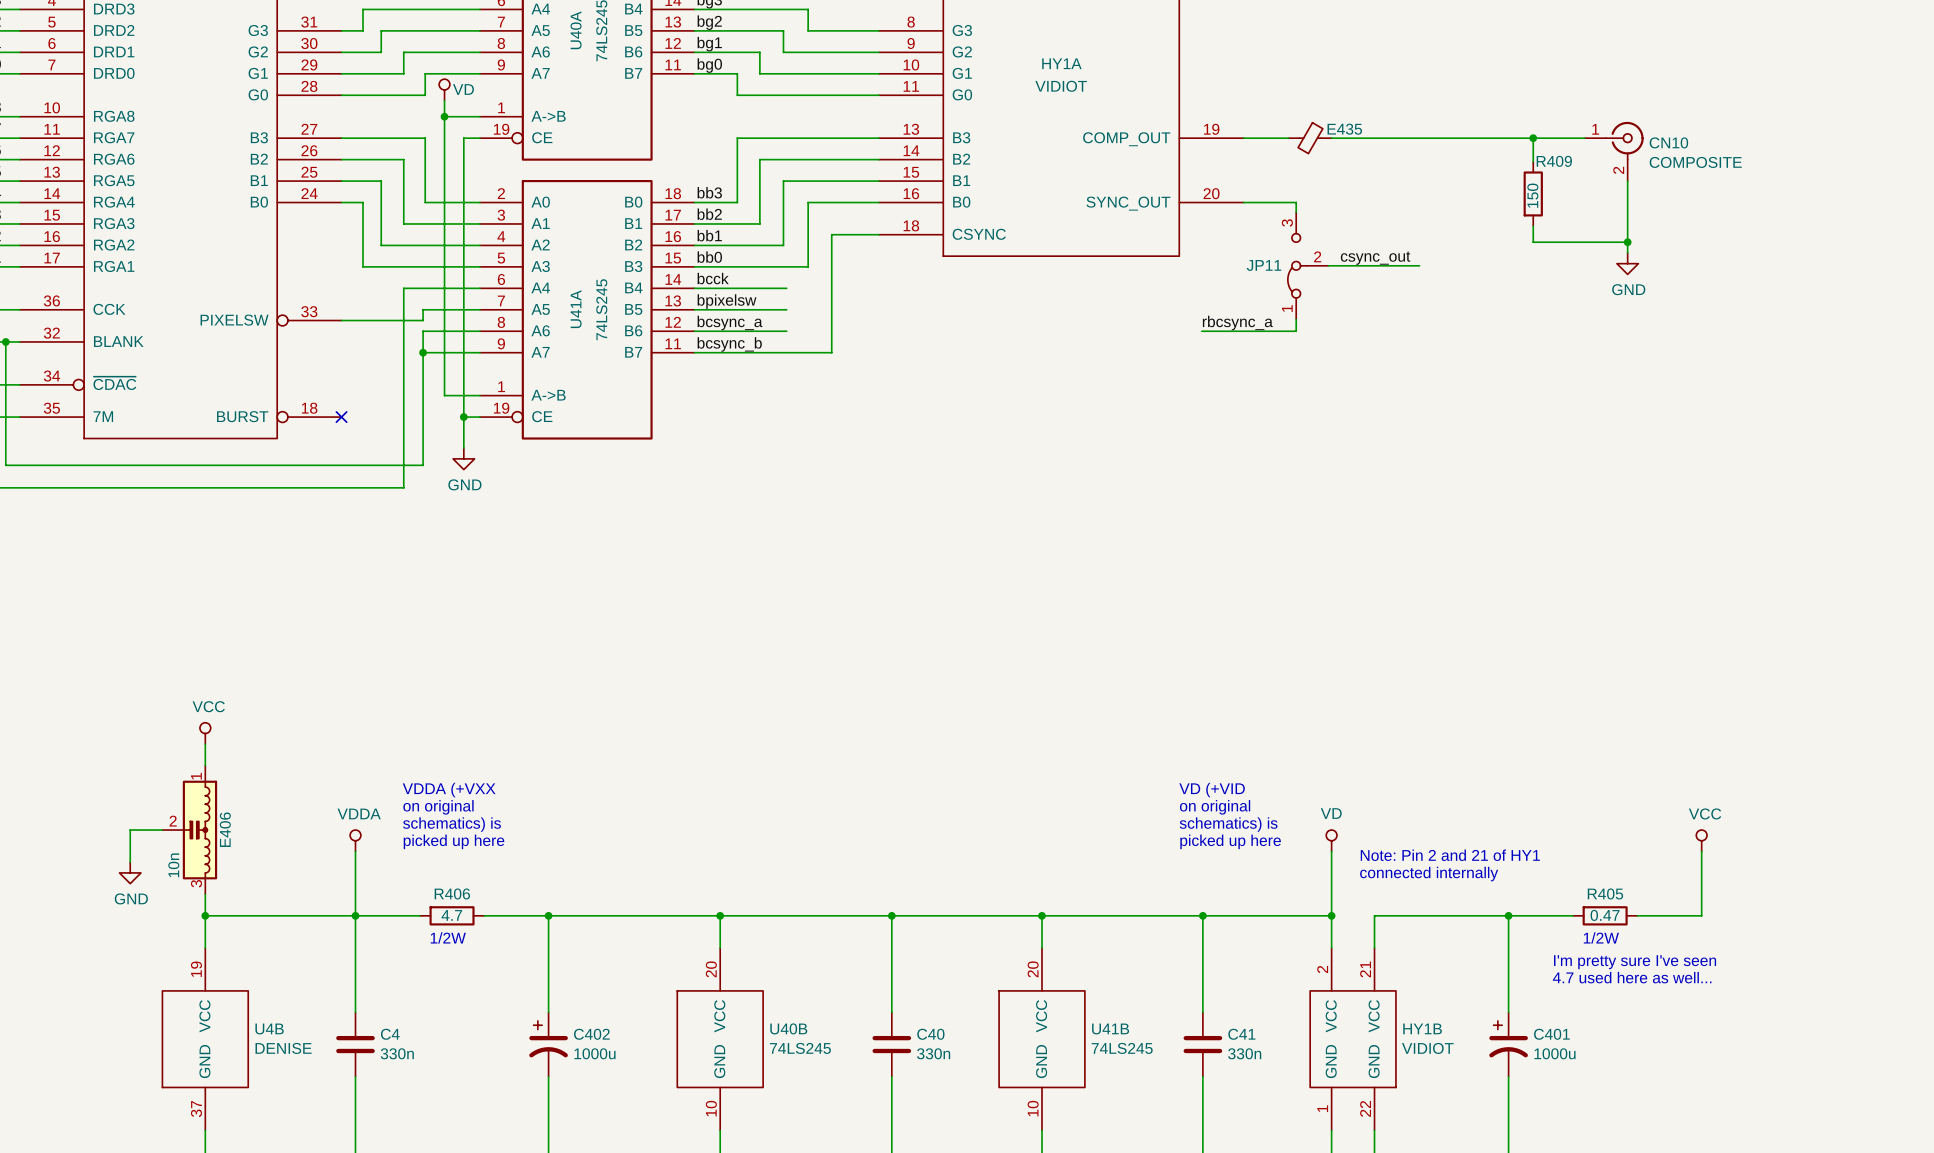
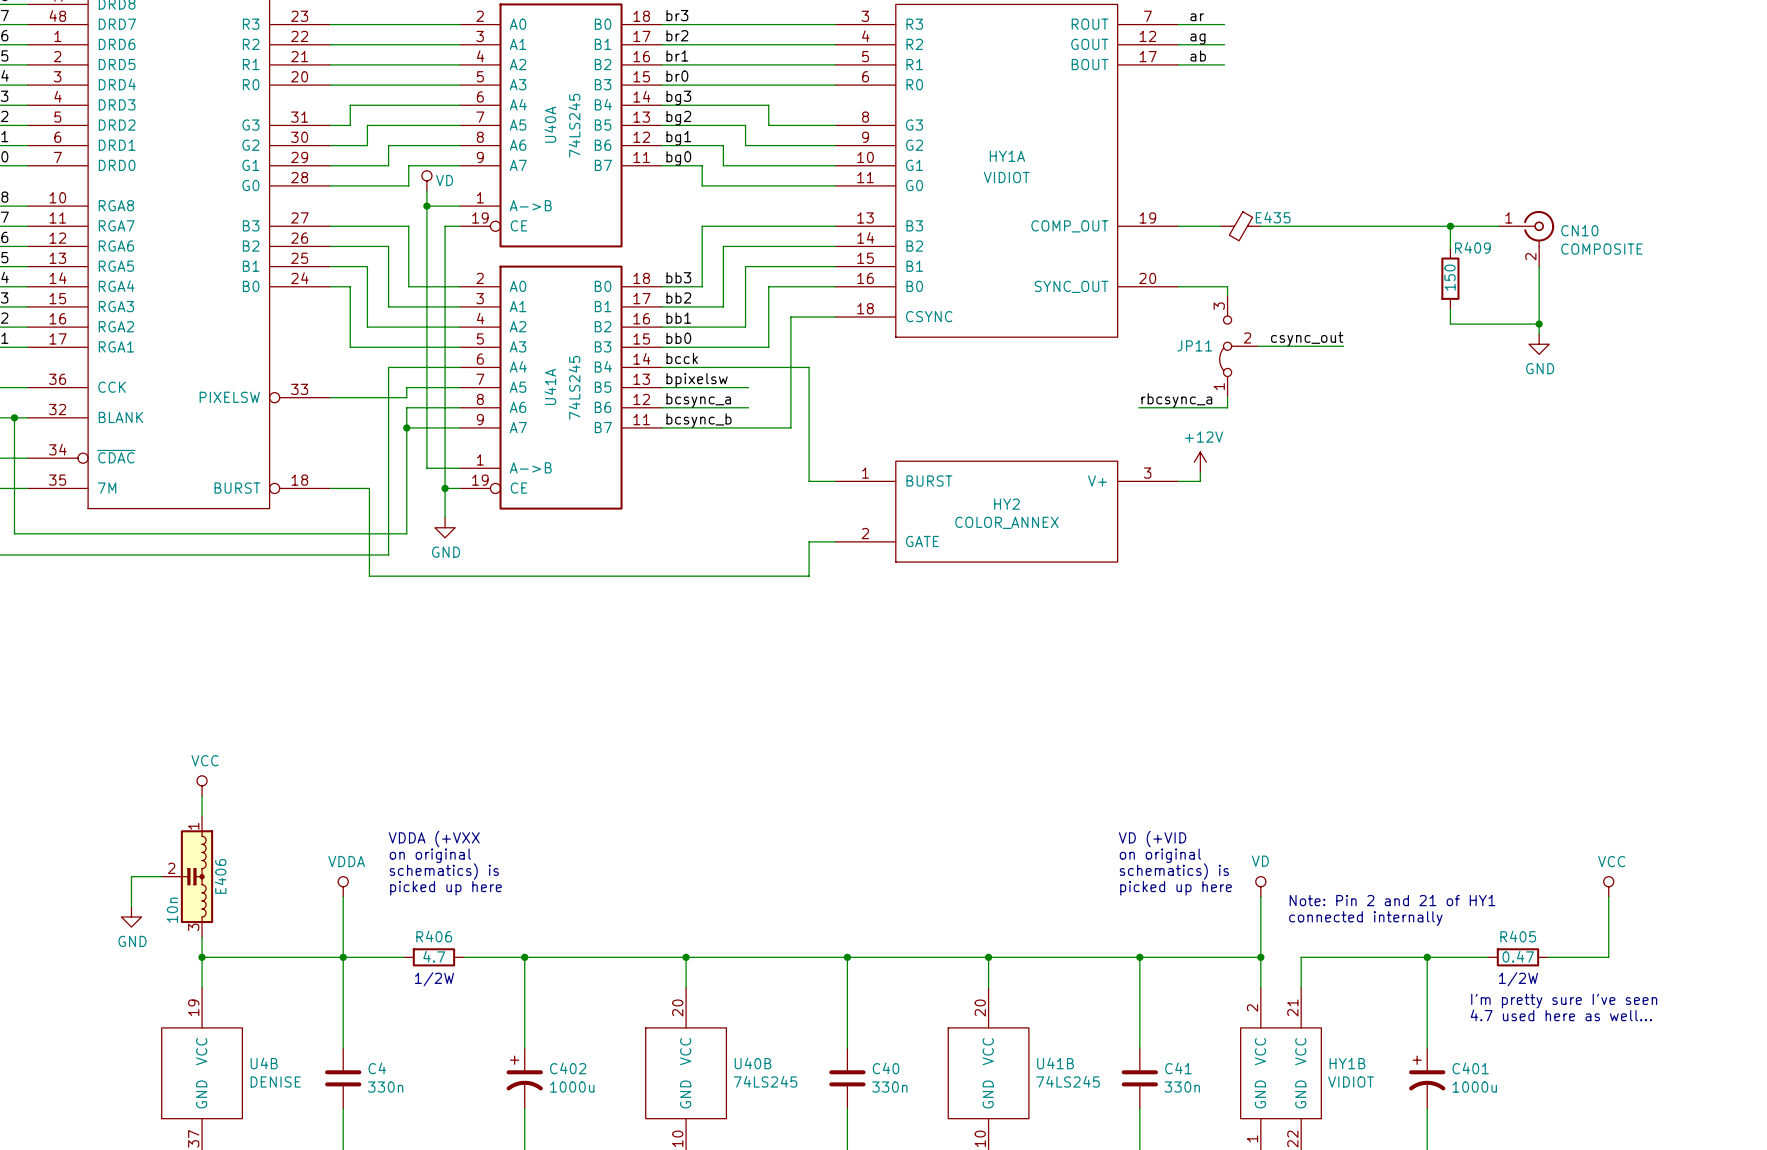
wire: none -> (748, 367) (809, 367) (809, 481) (835, 481)
power symbol: none -> +12V (1200, 462)
wire: none -> (1200, 472) (1200, 481) (1178, 481)
wire: none -> (330, 488) (369, 488) (369, 576) (809, 576) (809, 541) (835, 541)
no-connect mark: (341, 417) -> none
HY2: none -> COLOR_ANNEX (1006, 511)

